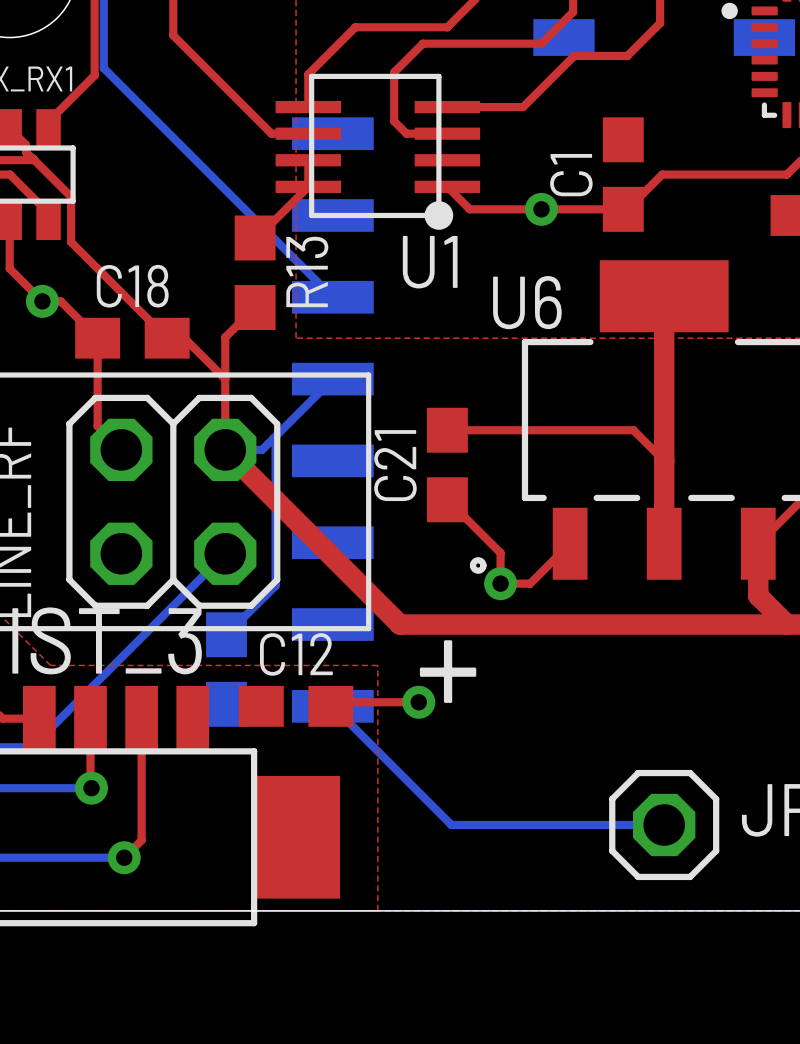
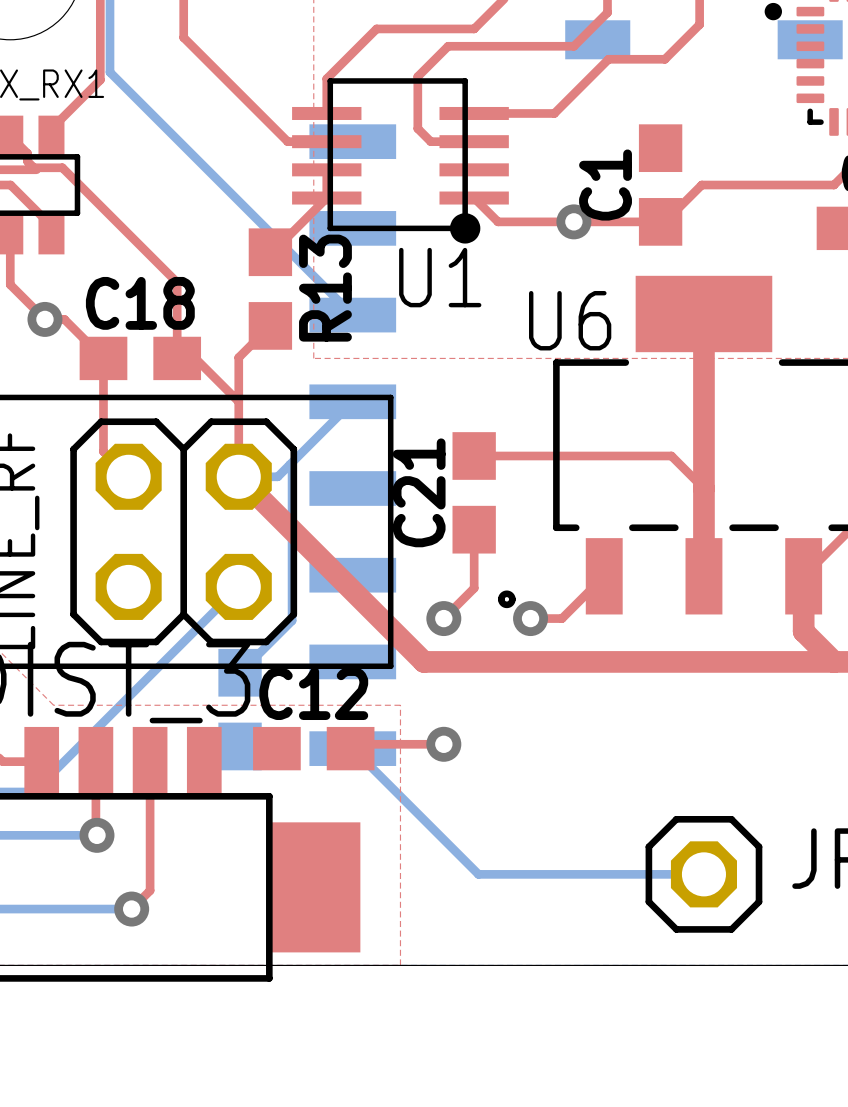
top track: (32, 158) (71, 196) (71, 242) (167, 338) -> (34, 167) (62, 167) (177, 282) (177, 358)
top track: (447, 499) (500, 552) (500, 583) -> (474, 529) (474, 588) (443, 618)
via: none -> (443, 618)
text: + (448, 671) -> none

